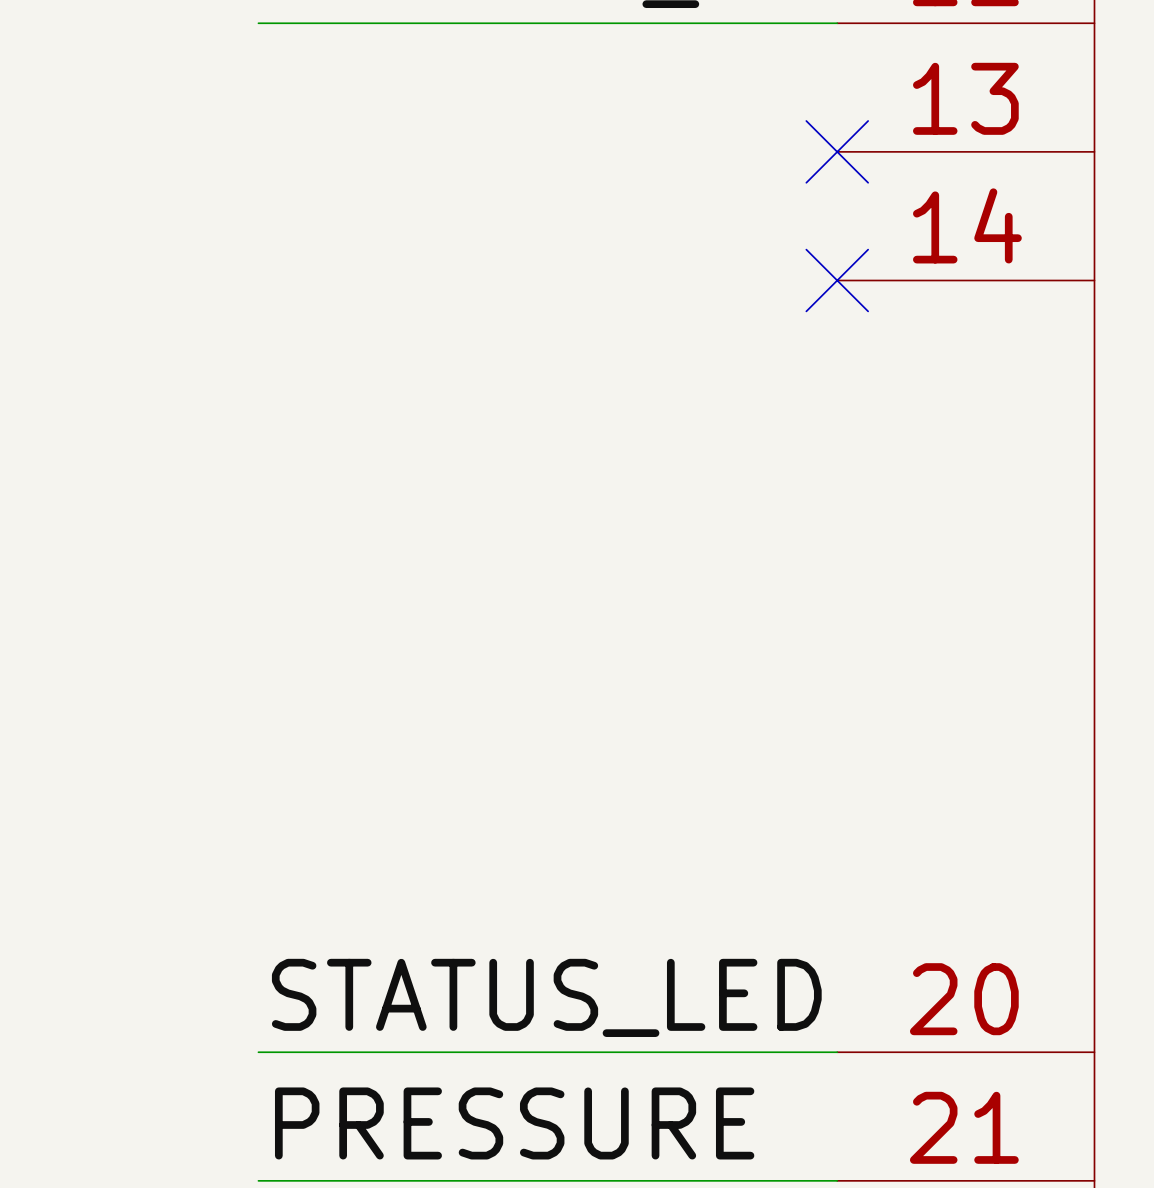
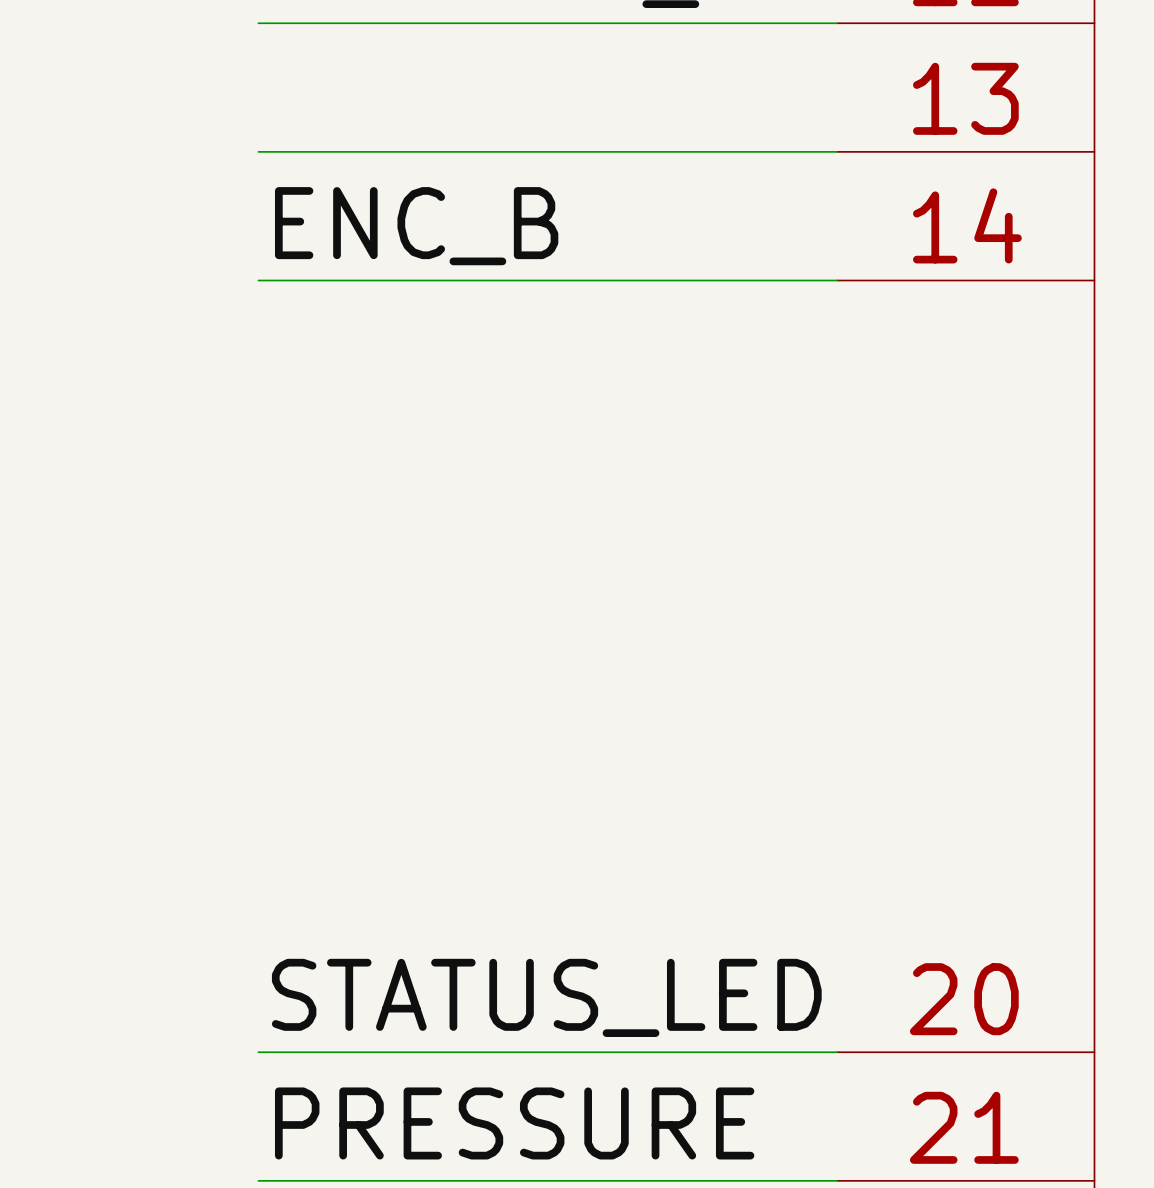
wire: none -> (258, 151) (837, 151)
no-connect mark: (837, 151) -> none
label: none -> ENC_B (416, 226)
wire: none -> (258, 280) (837, 280)
no-connect mark: (837, 280) -> none

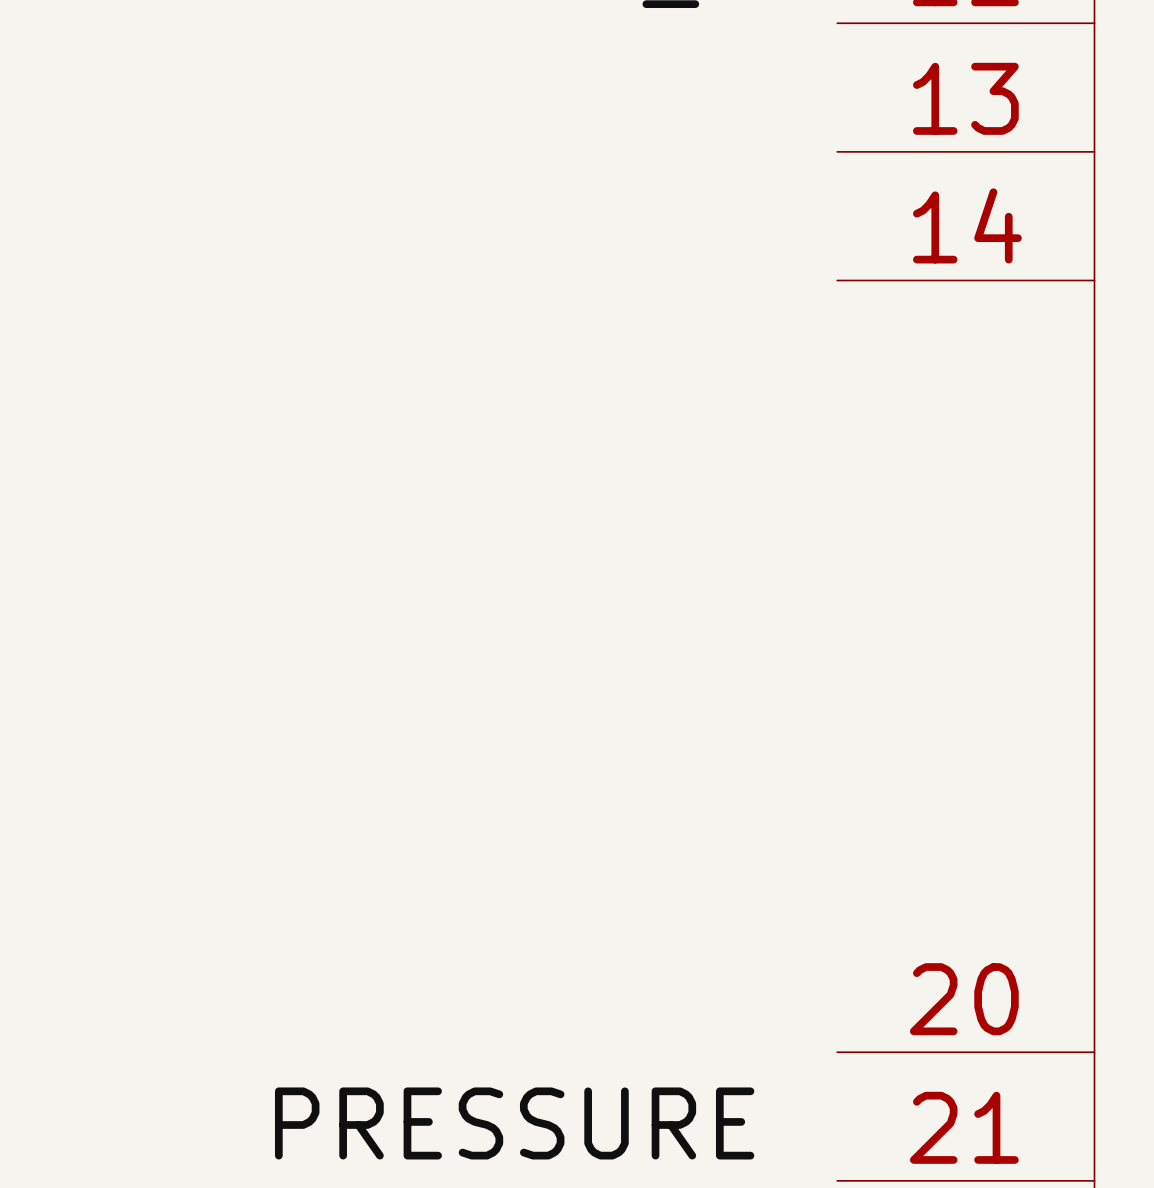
wire: (258, 23) (837, 23) -> none
wire: (258, 151) (837, 151) -> none
label: ENC_B (416, 226) -> none
wire: (258, 280) (837, 280) -> none
label: STATUS_LED (546, 997) -> none
wire: (258, 1052) (837, 1052) -> none
wire: (258, 1180) (837, 1180) -> none

